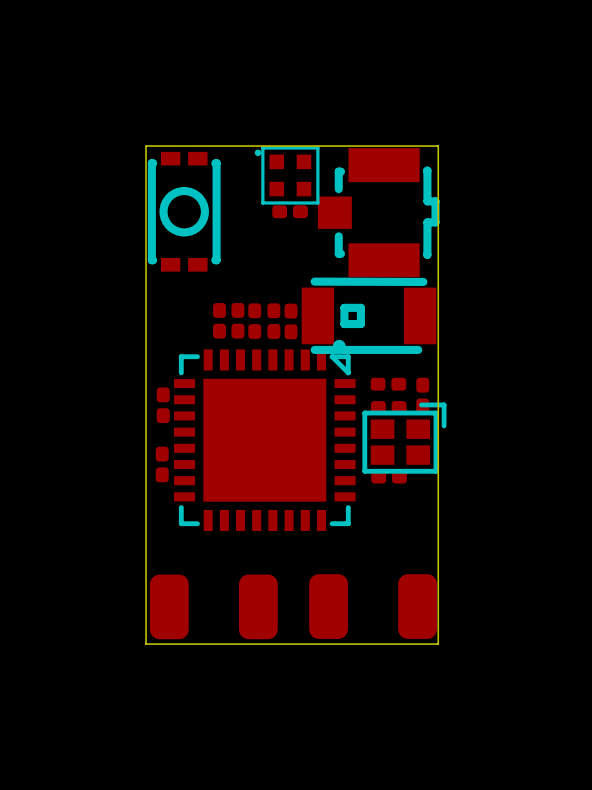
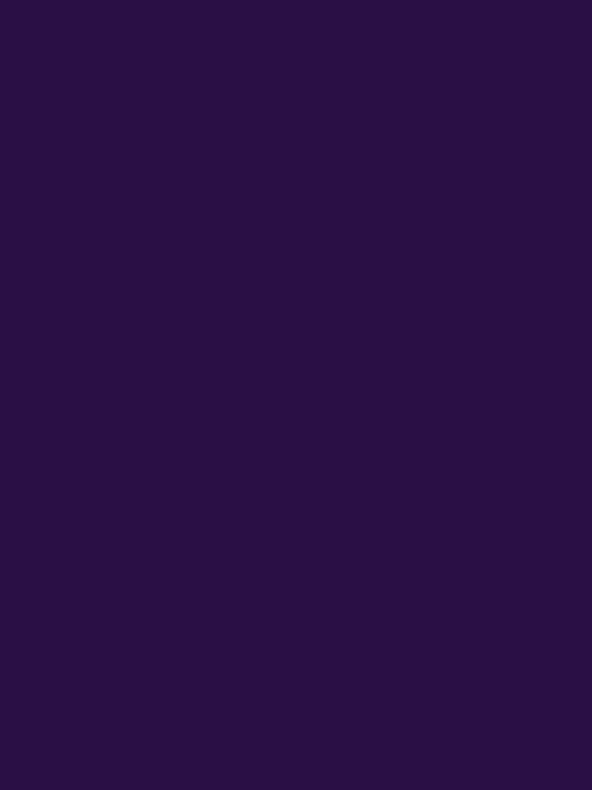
board edge: (146, 146) (438, 146) (438, 644) (146, 644) (146, 146) -> none
part: (287, 175) -> none
part: (184, 211) -> none
part: (290, 211) -> none
part: (378, 212) -> none
part: (369, 315) -> none
part: (219, 320) -> none
part: (237, 320) -> none
part: (254, 321) -> none
part: (273, 321) -> none
part: (291, 321) -> none
part: (388, 384) -> none
part: (422, 395) -> none
part: (163, 405) -> none
part: (388, 407) -> none
part: (264, 435) -> none
part: (404, 438) -> none
part: (162, 464) -> none
part: (389, 477) -> none
part: (169, 606) -> none
part: (258, 606) -> none
part: (328, 606) -> none
part: (417, 606) -> none

